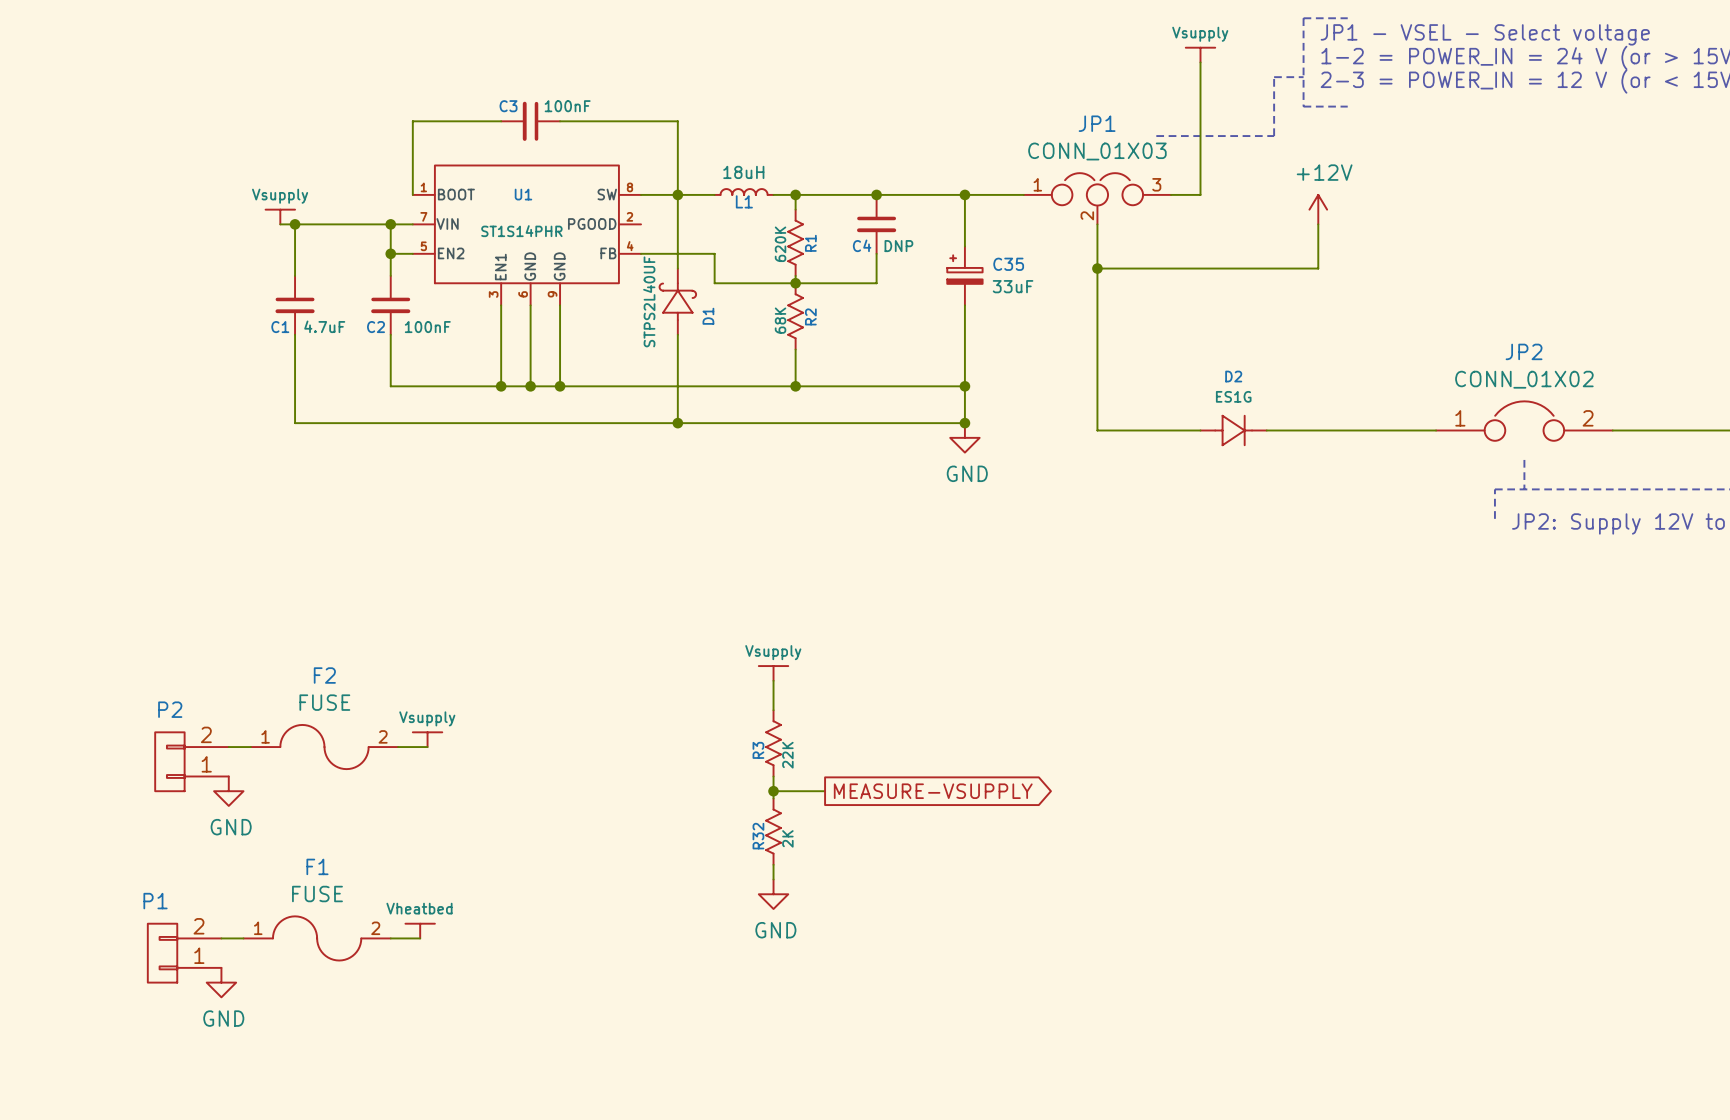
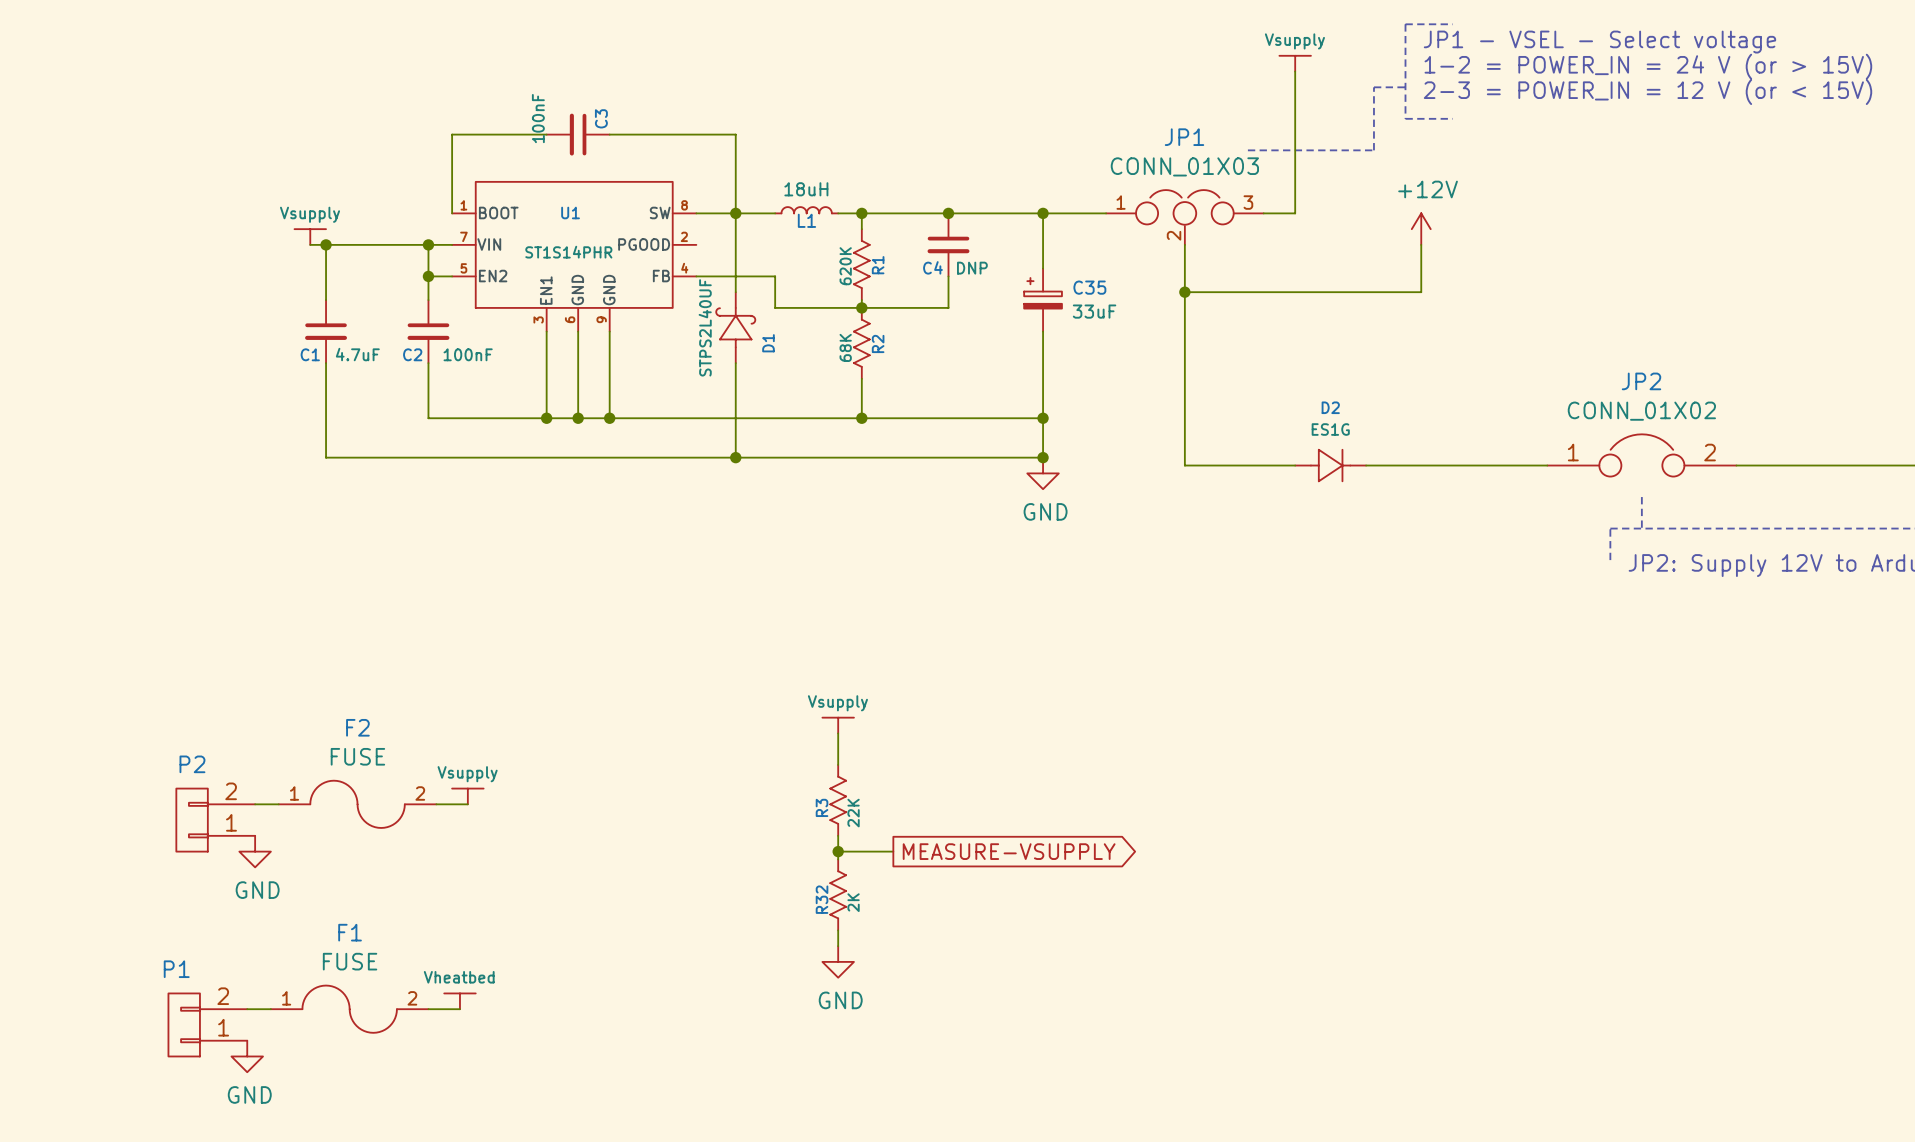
C3 name rotation: 0° (508, 106) -> 90° counterclockwise (601, 118)
C3 name position: C3 (508, 106) -> C3 (601, 118)
C3 value rotation: 0° (567, 106) -> 90° counterclockwise (538, 118)
C3 value position: 100nF (567, 106) -> 100nF (538, 118)

